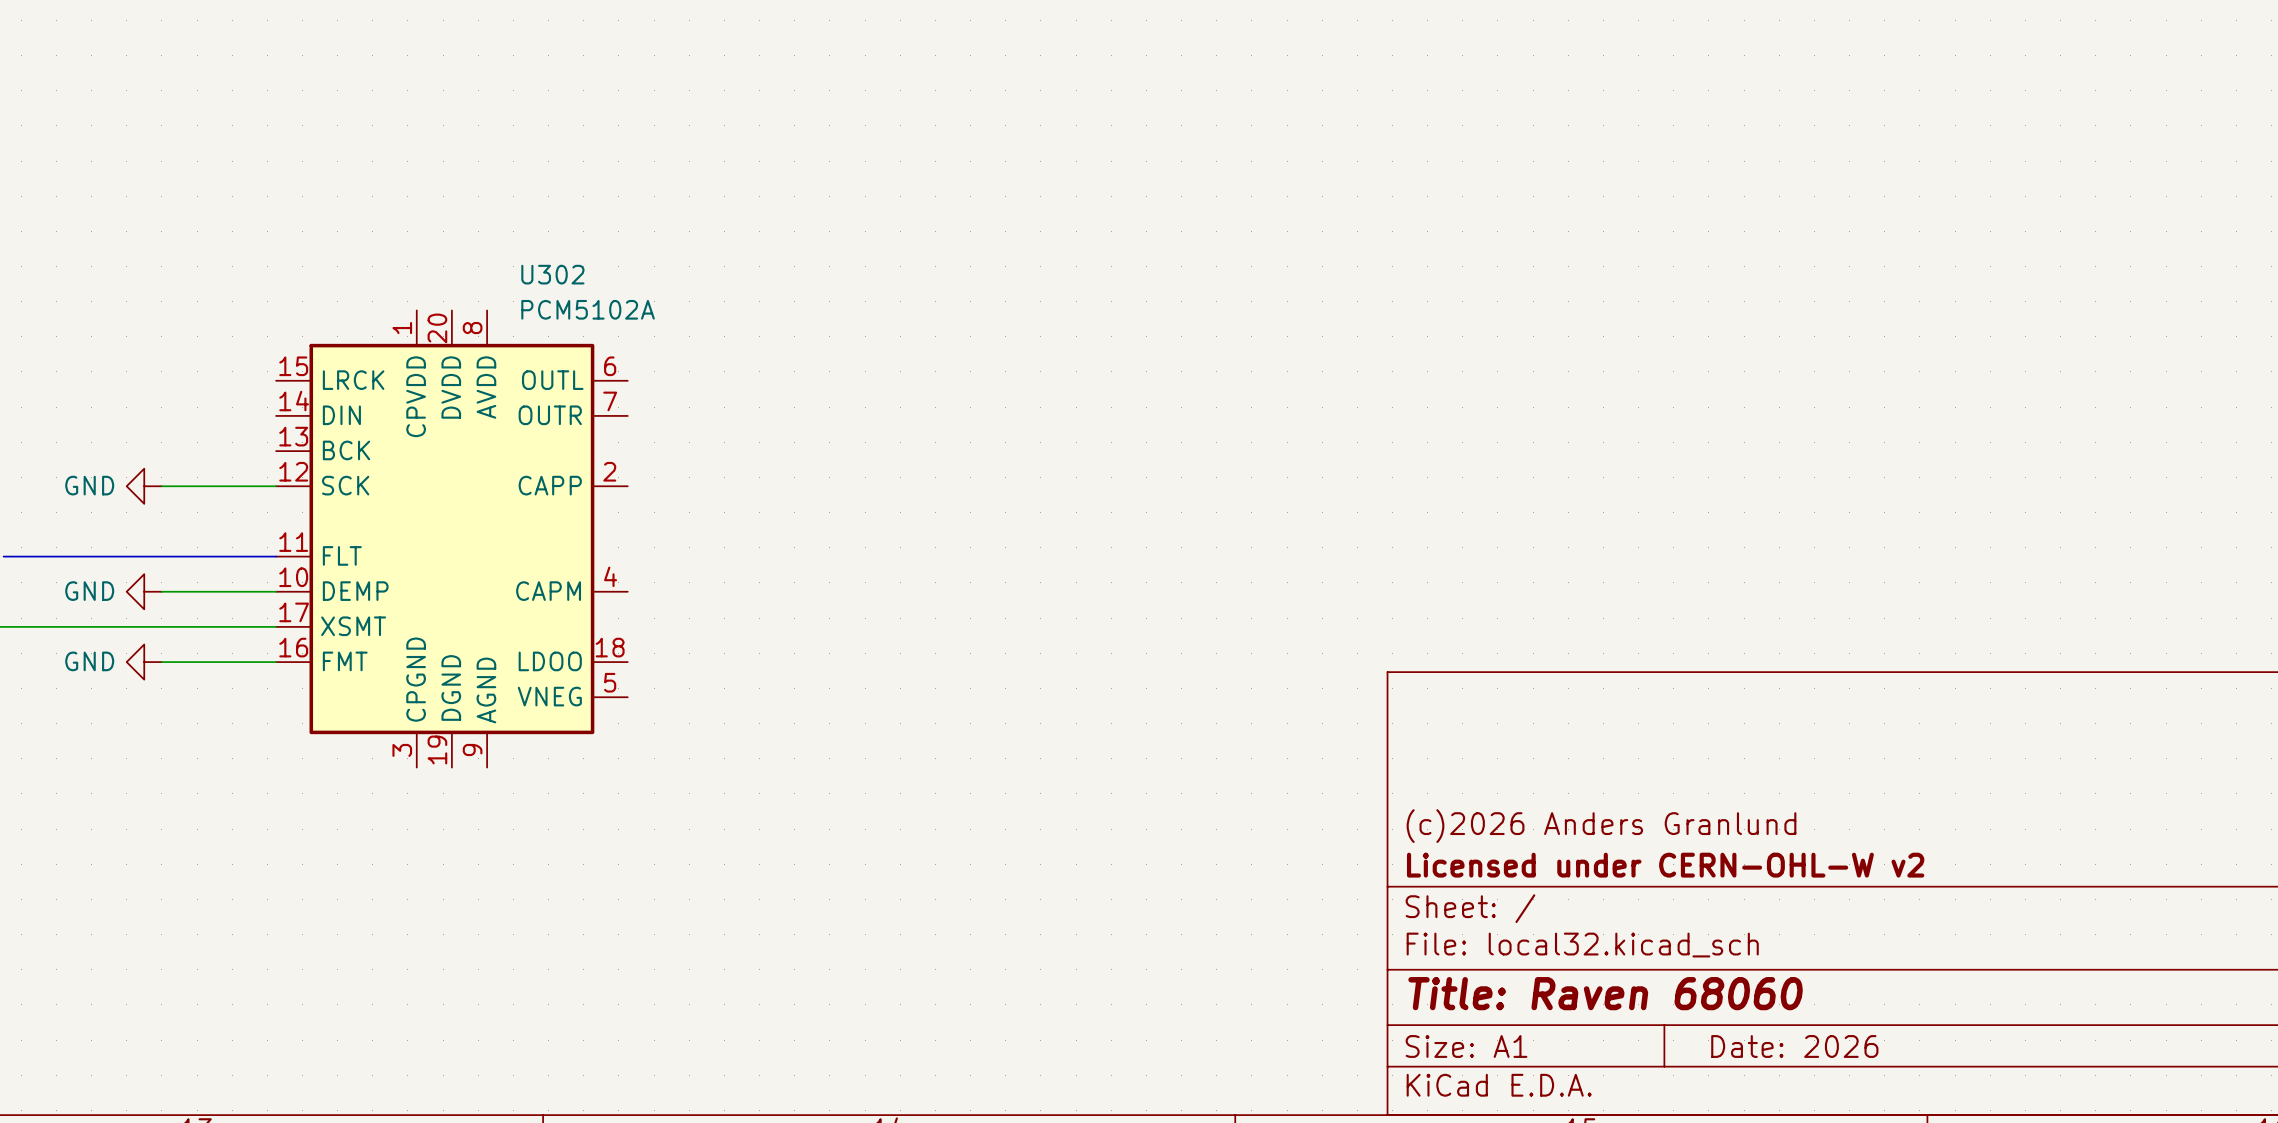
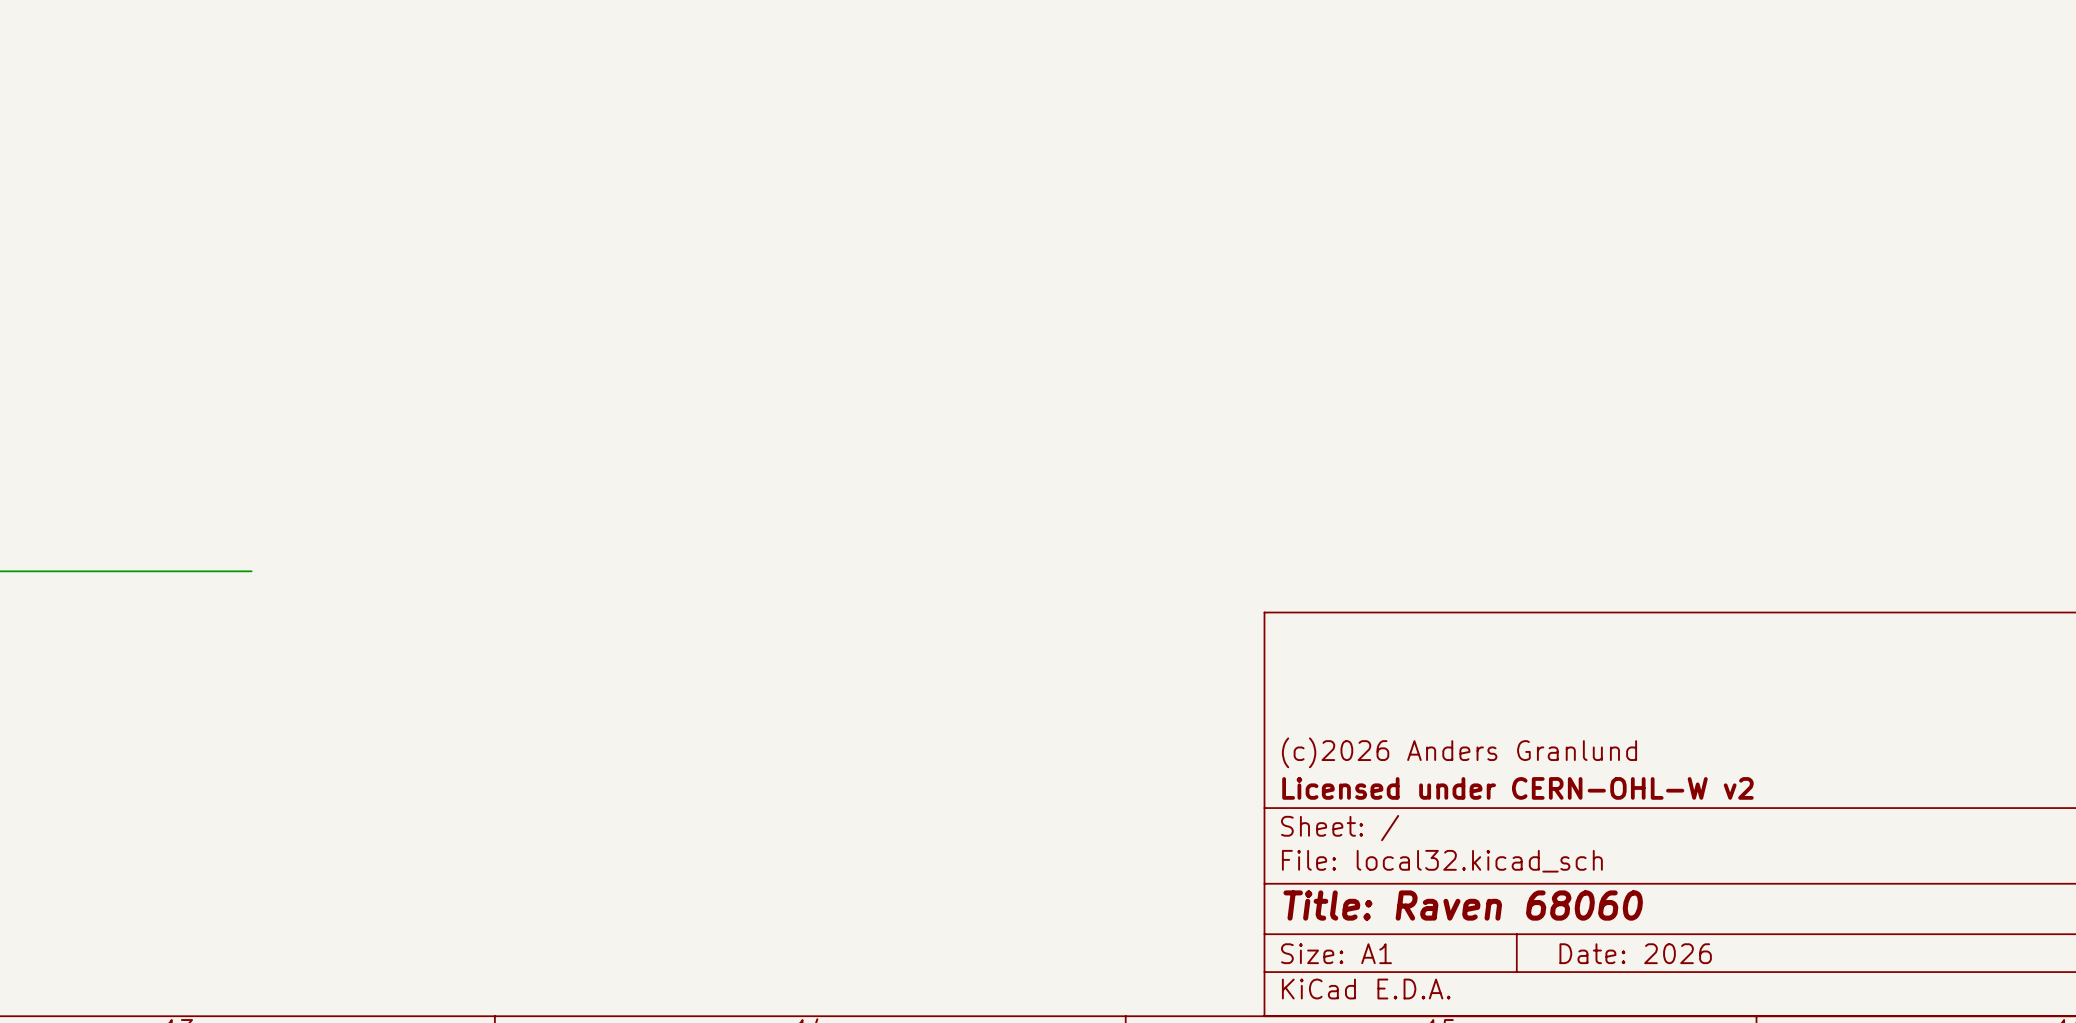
power symbol: GND (144, 486) -> none
wire: (161, 486) (276, 486) -> none
U302: PCM5102A (451, 539) -> none
bus: (3, 556) (276, 556) -> none
power symbol: GND (144, 591) -> none
wire: (161, 591) (276, 591) -> none
power symbol: GND (144, 662) -> none
wire: (161, 662) (276, 662) -> none

